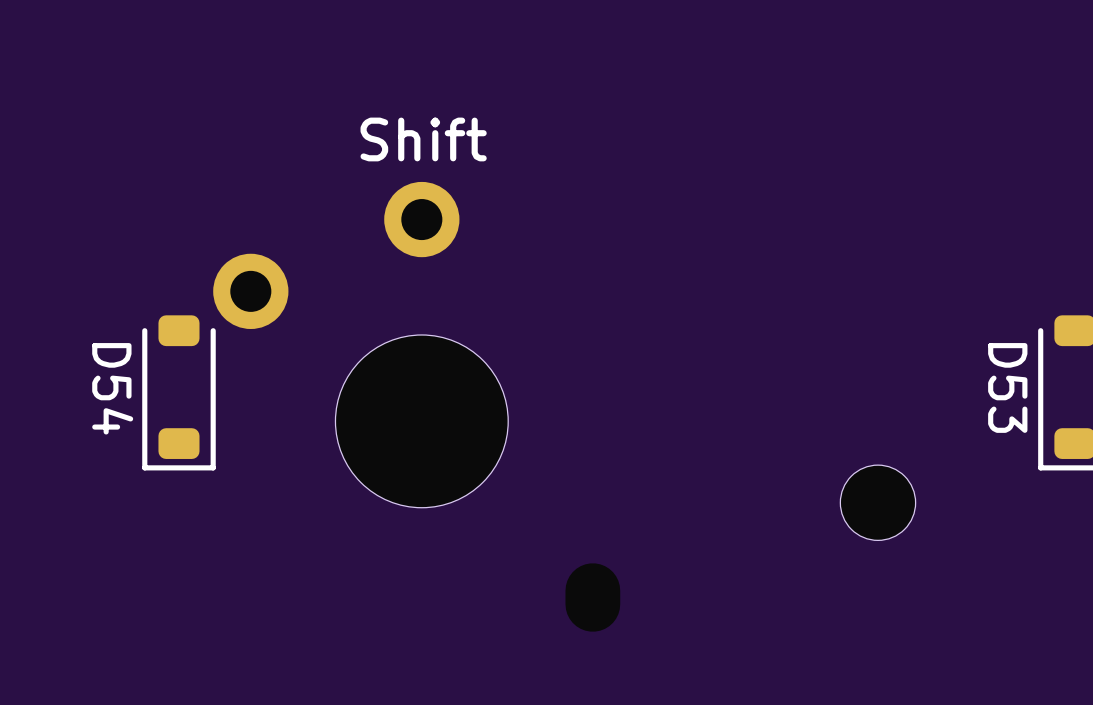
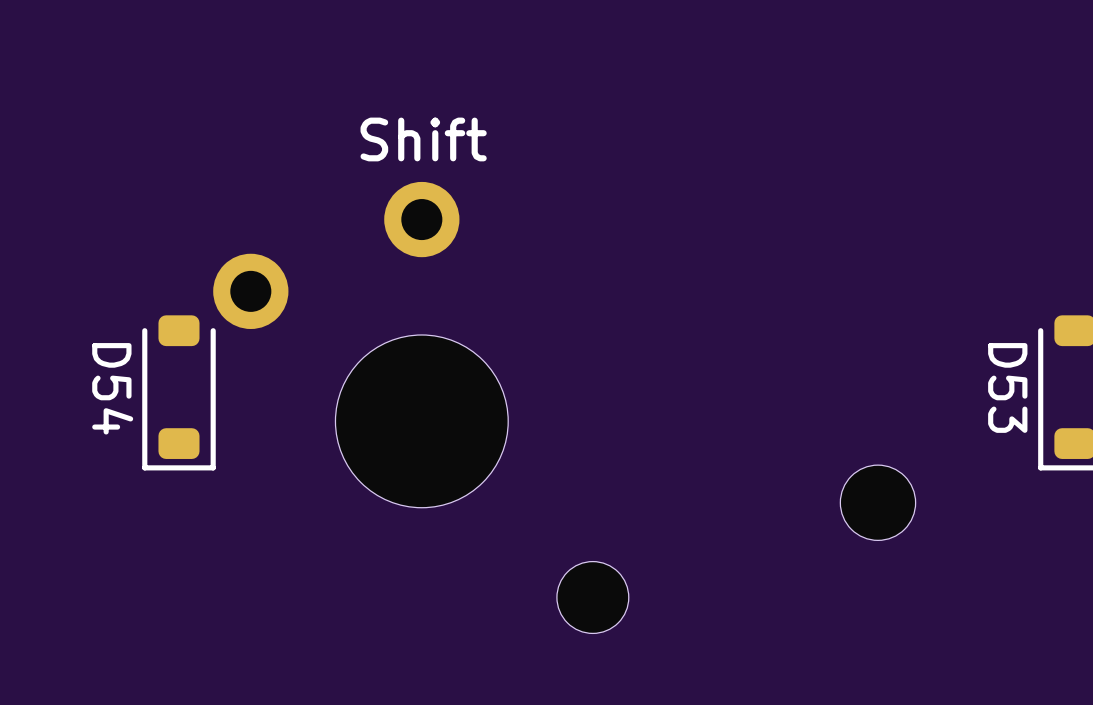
part footprint: [213, 181, 621, 632] -> [213, 181, 629, 634]

